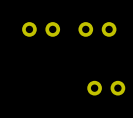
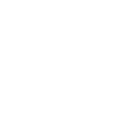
part: (41, 29) -> none
part: (97, 29) -> none
part: (106, 88) -> none

